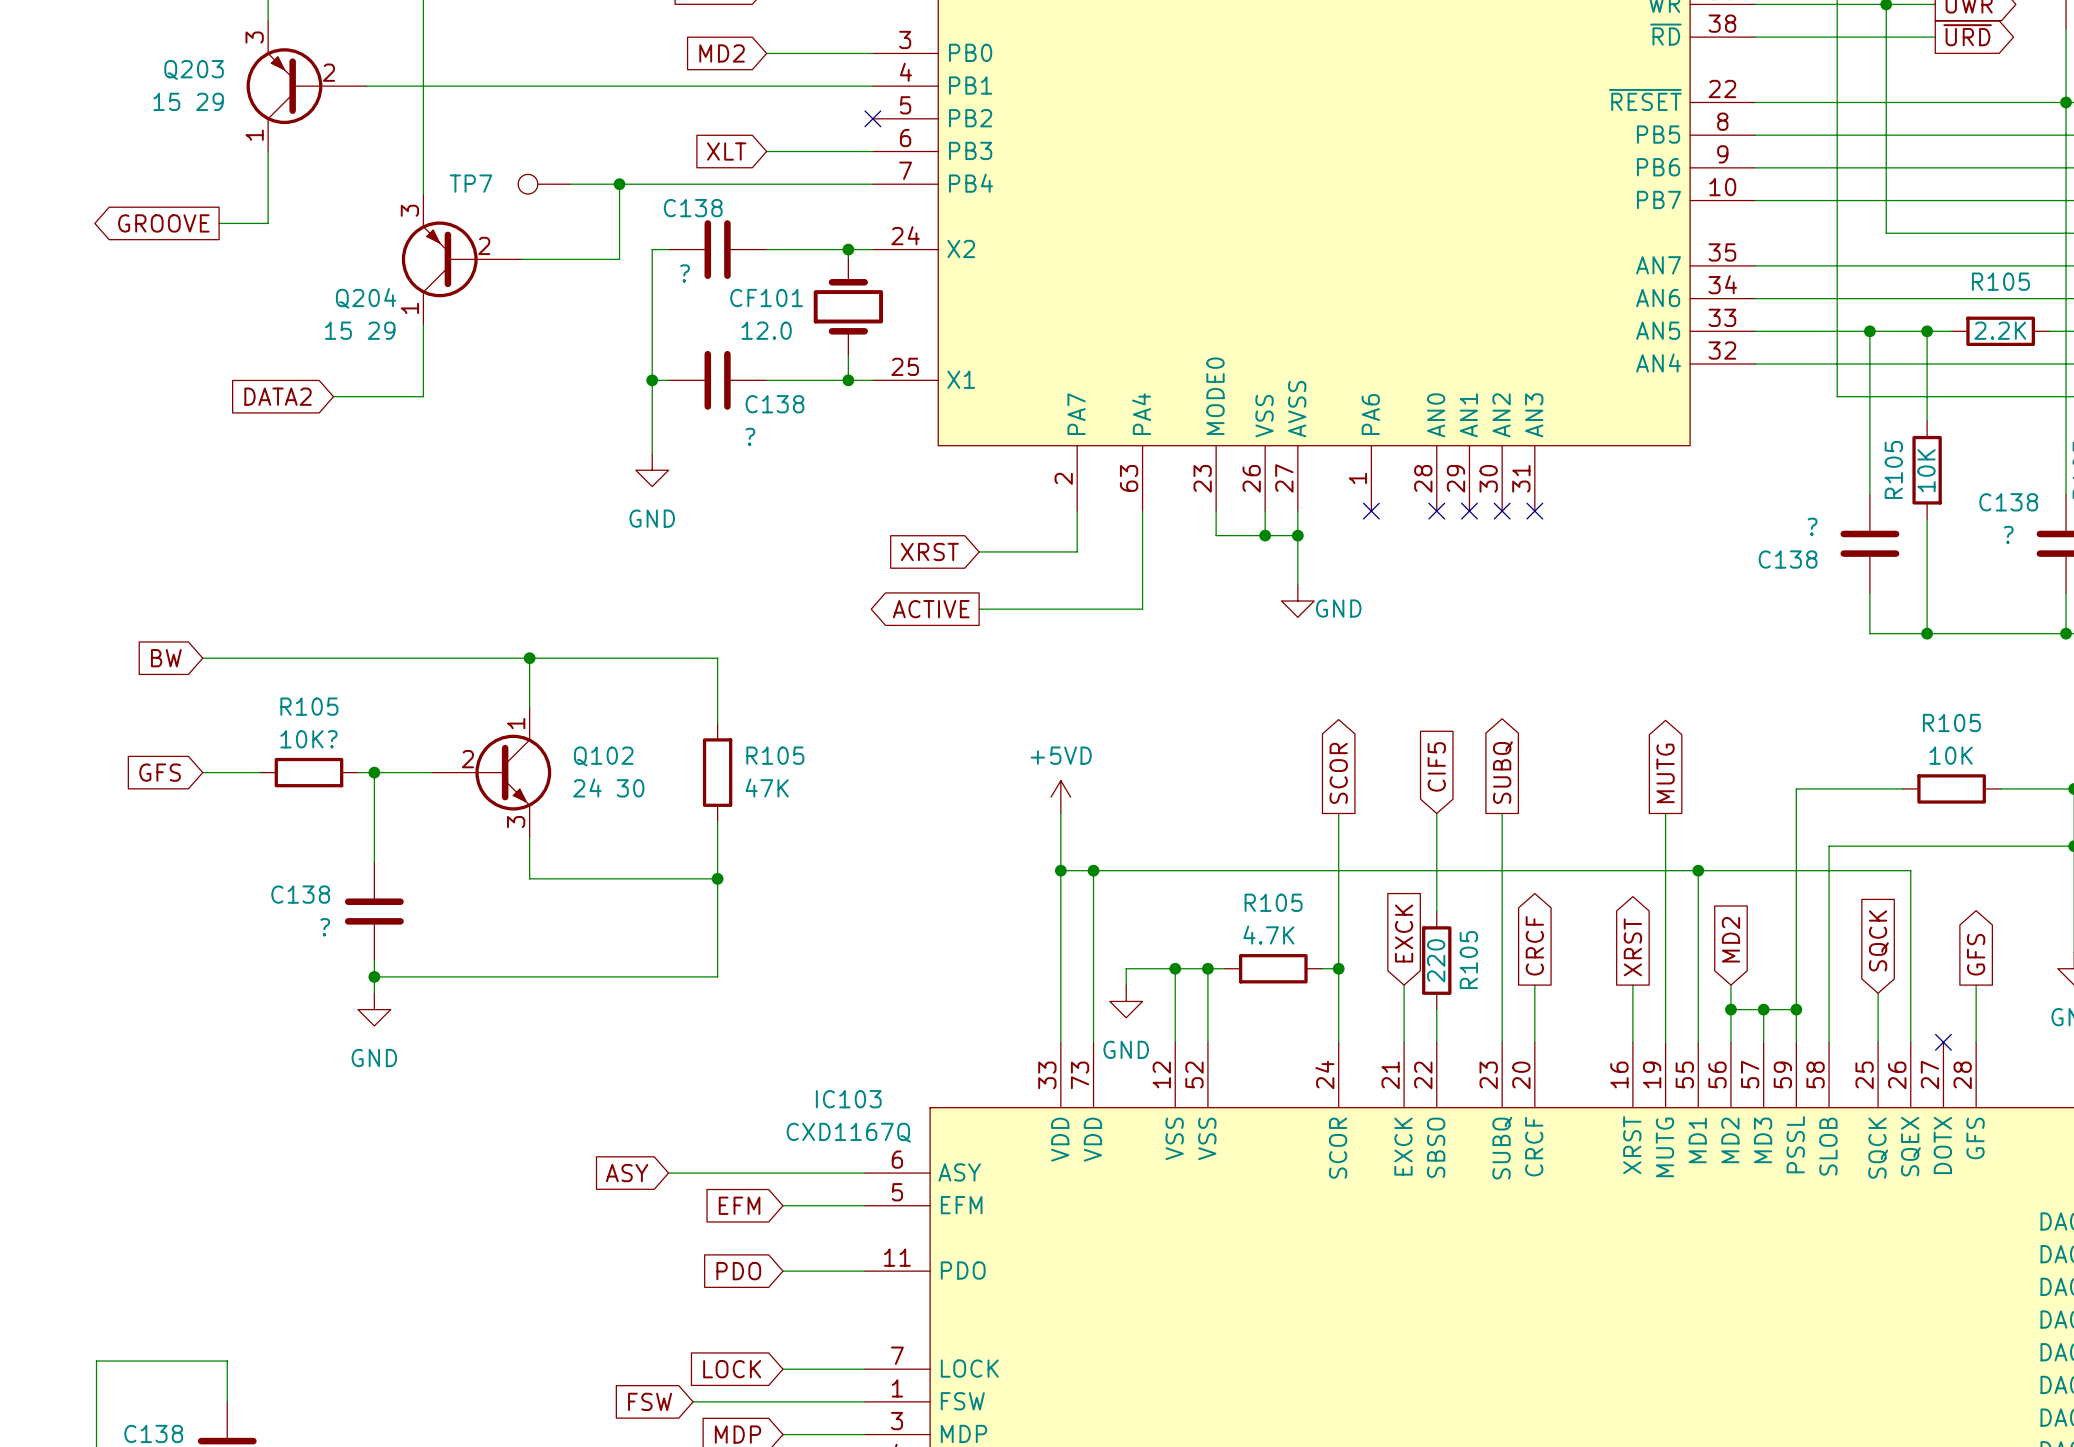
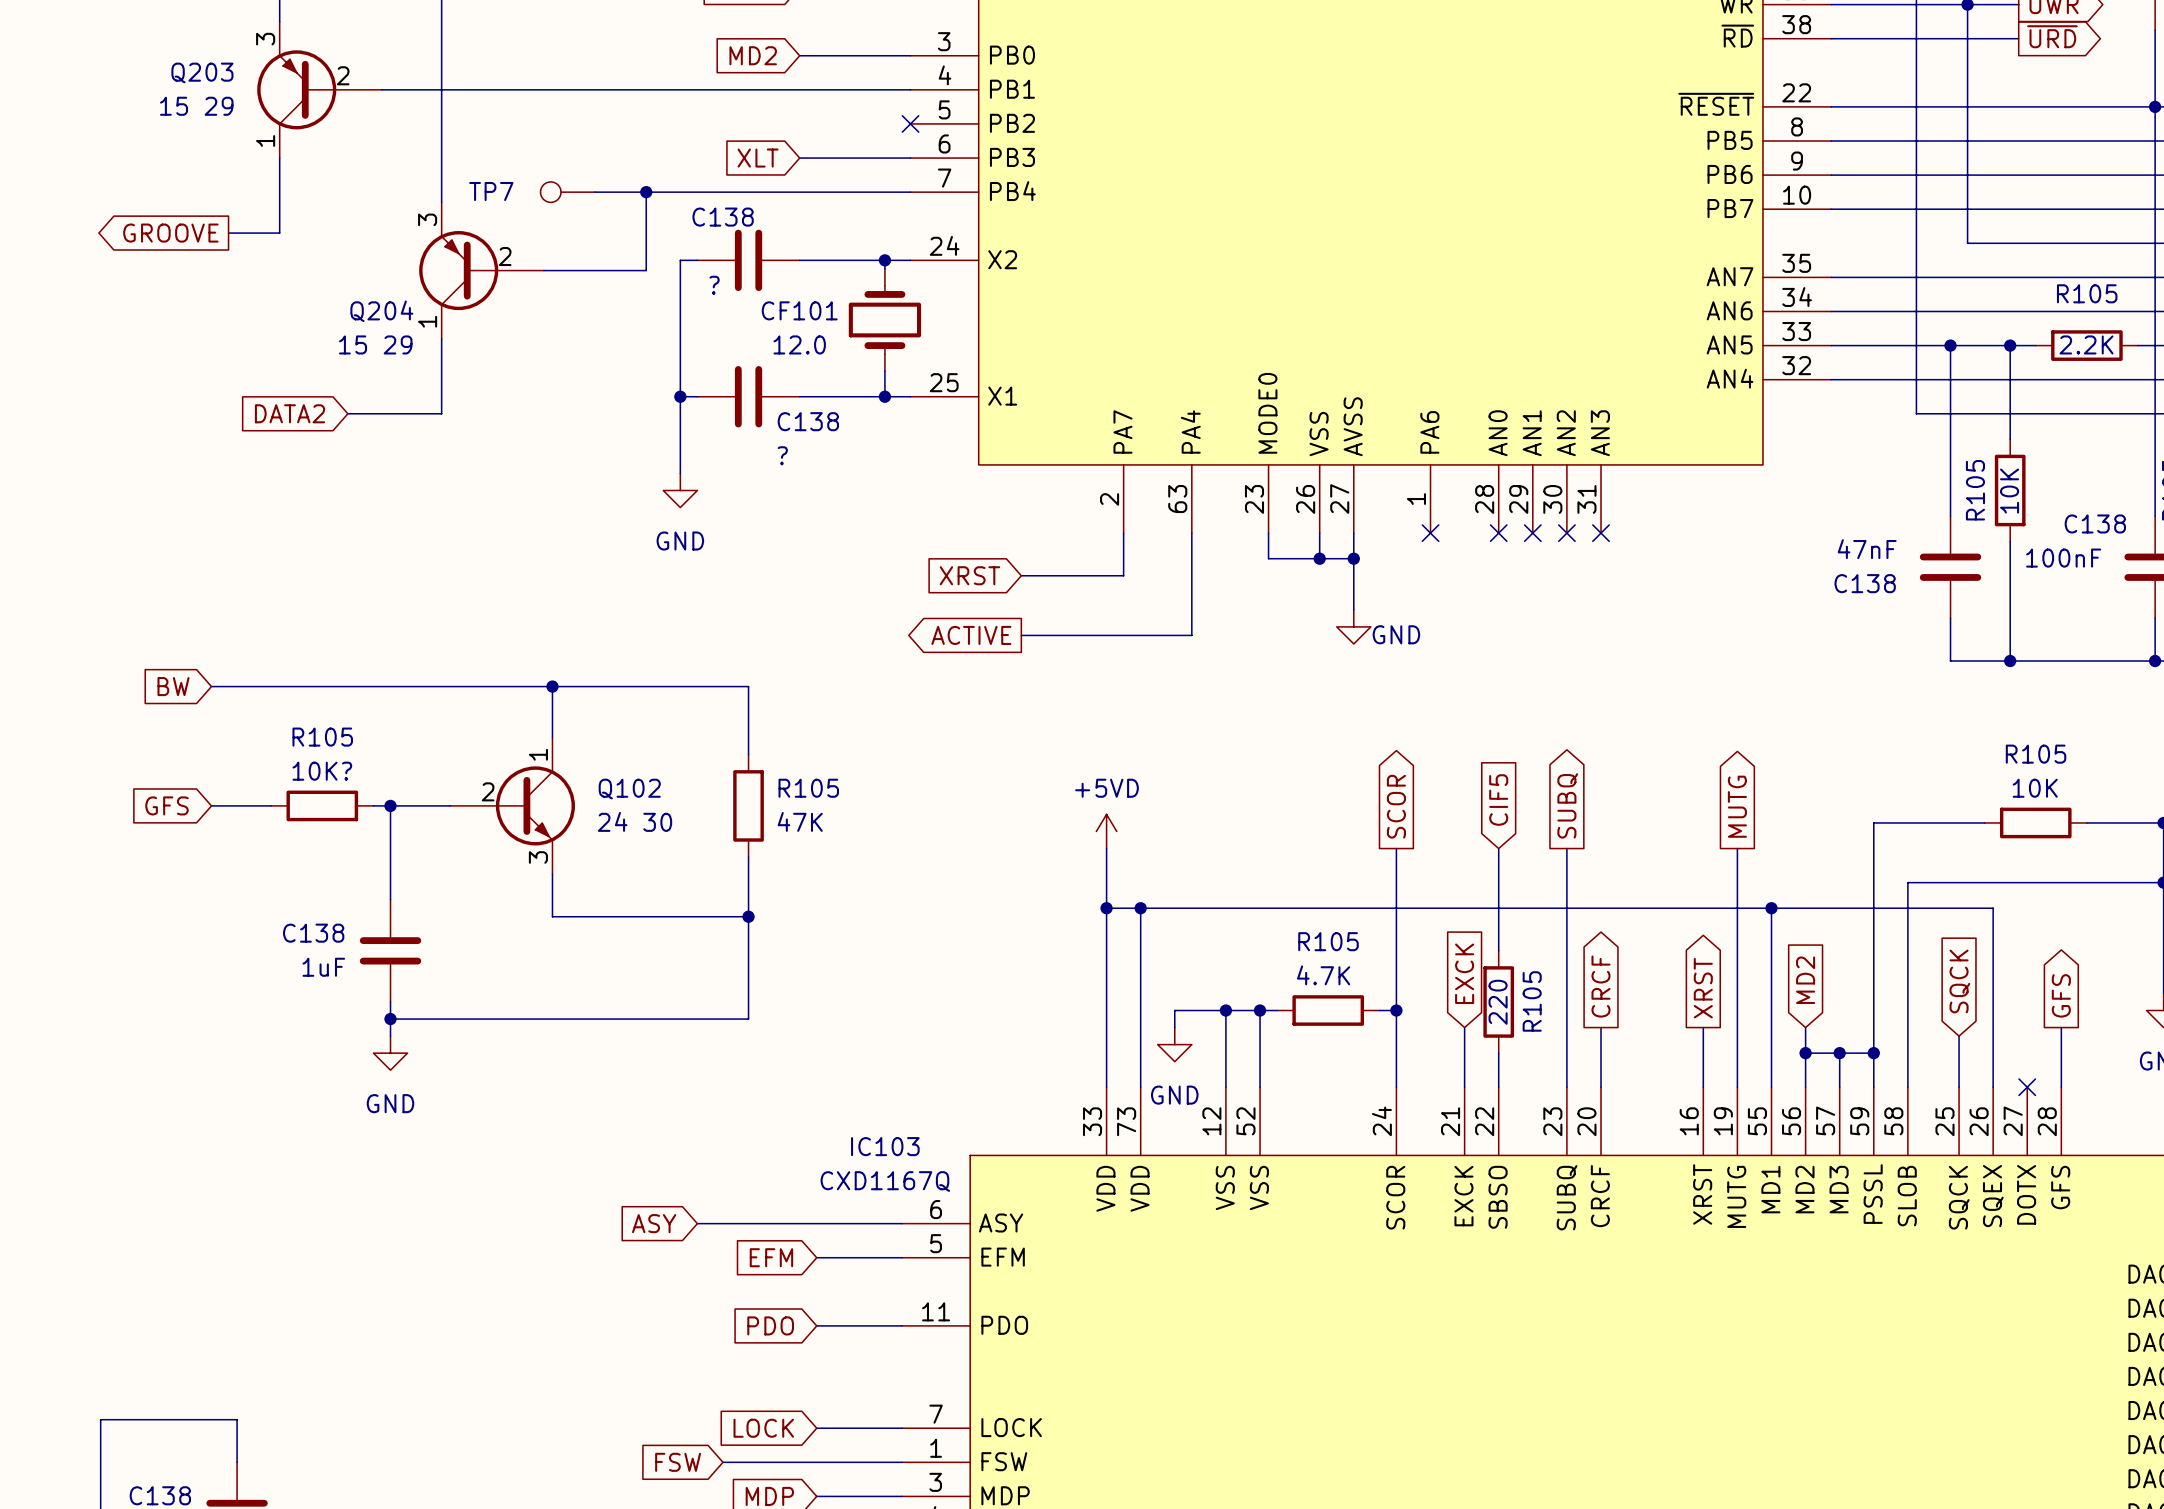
C138 value: ? (1812, 526) -> 47nF (1867, 549)
C138 value: ? (2008, 535) -> 100nF (2063, 558)
C138 value: ? (325, 927) -> 1uF (323, 967)

